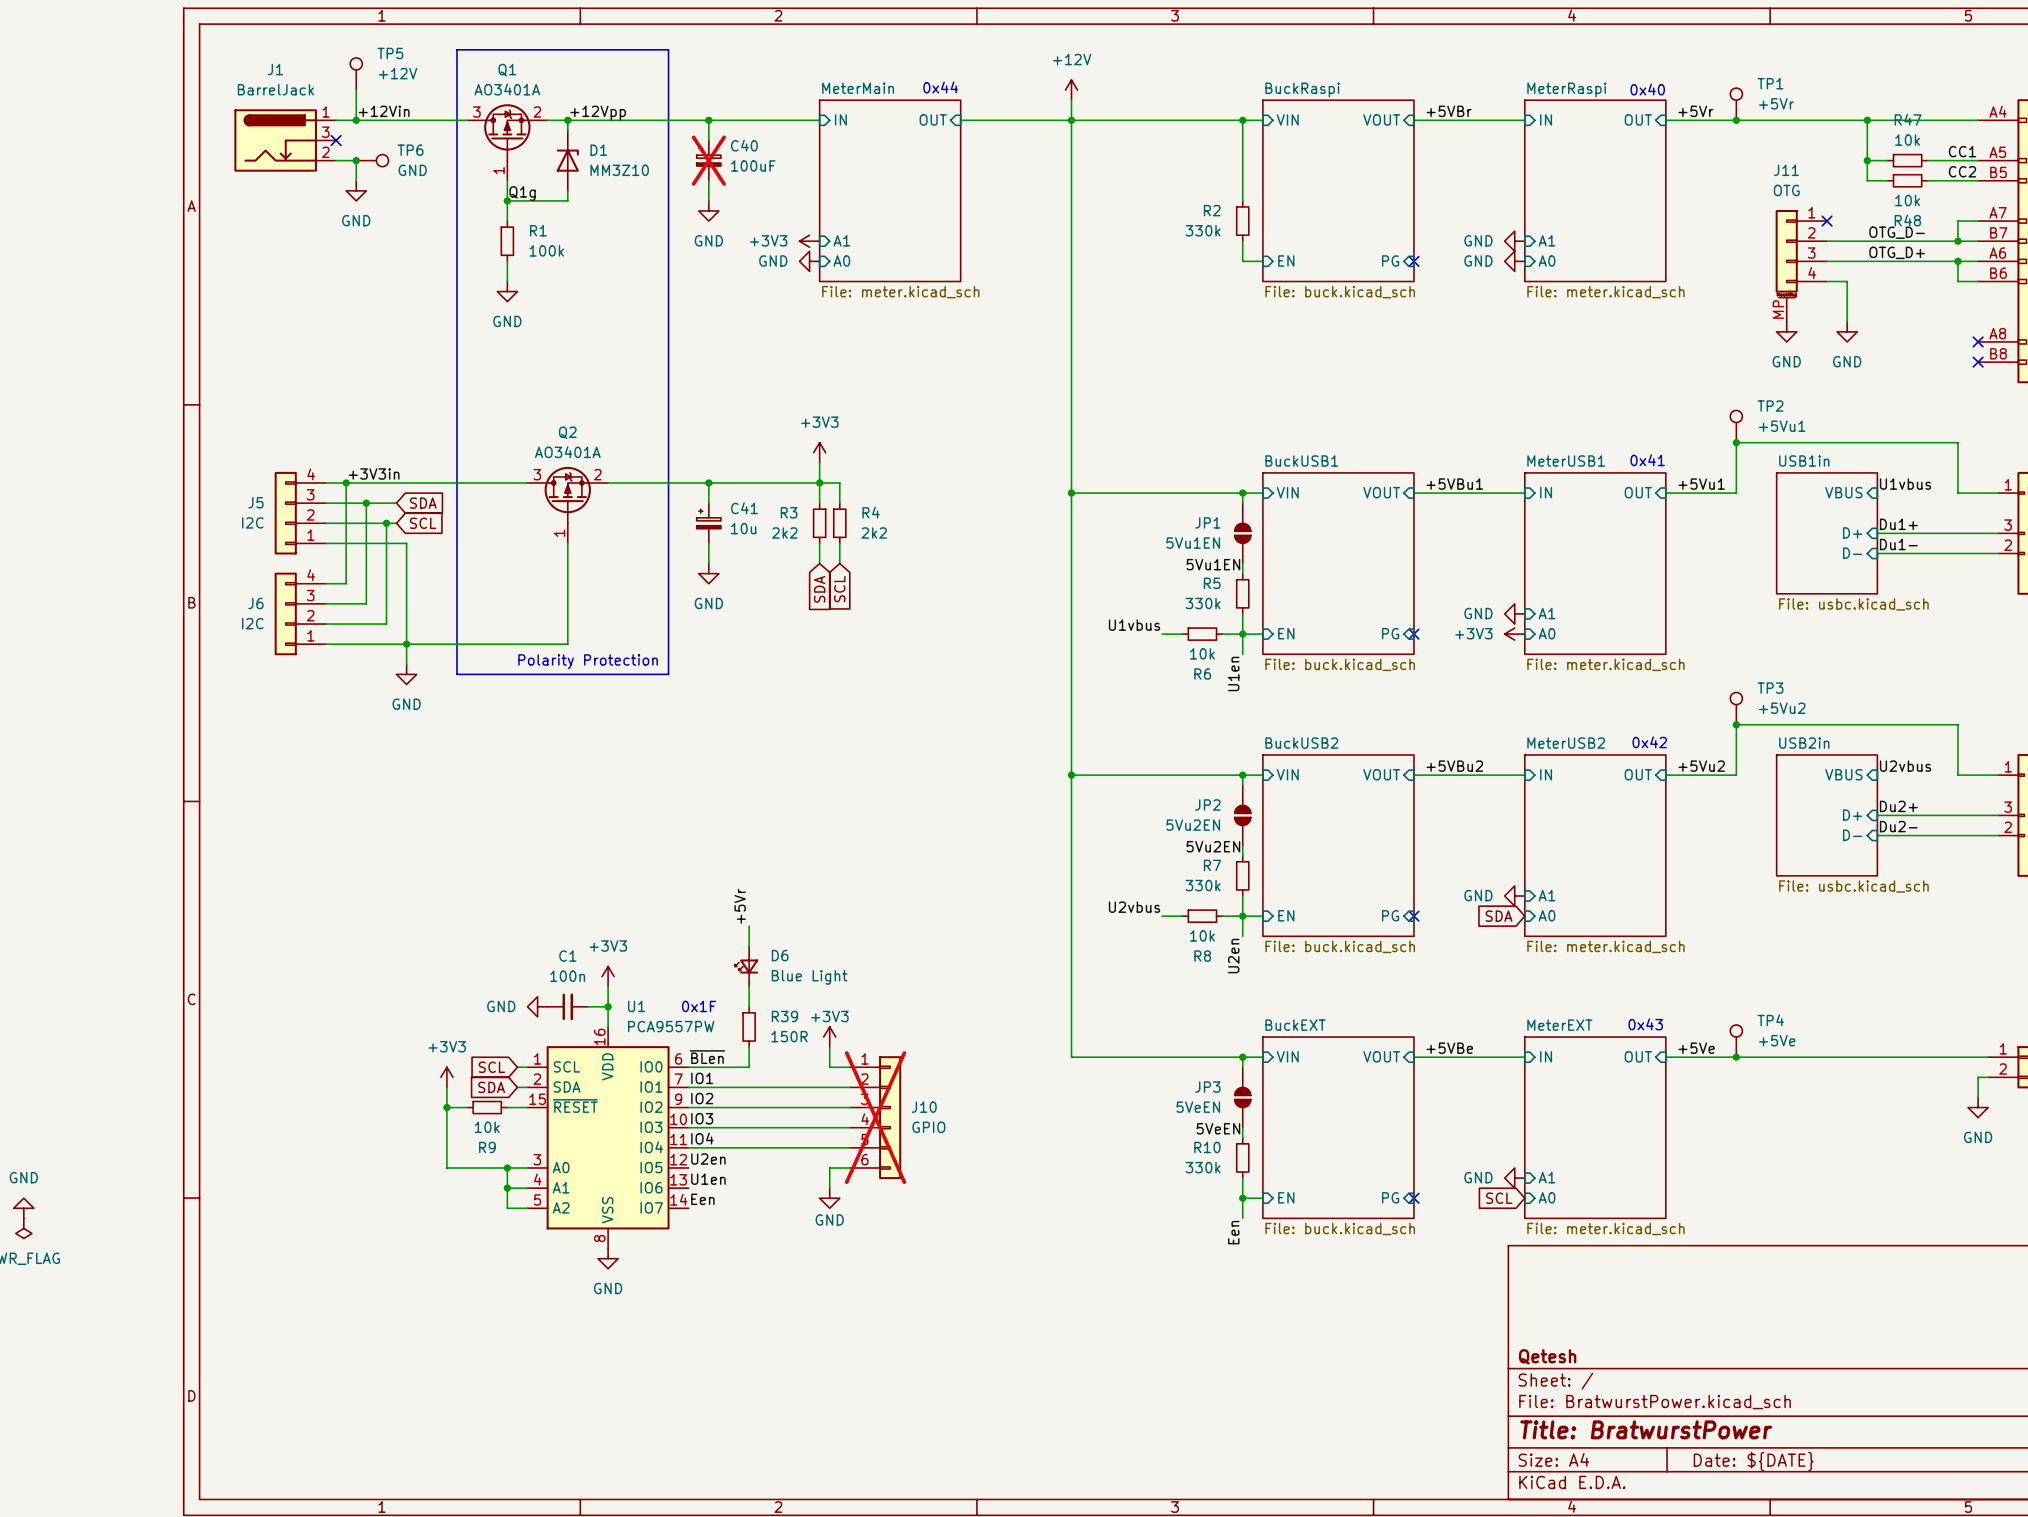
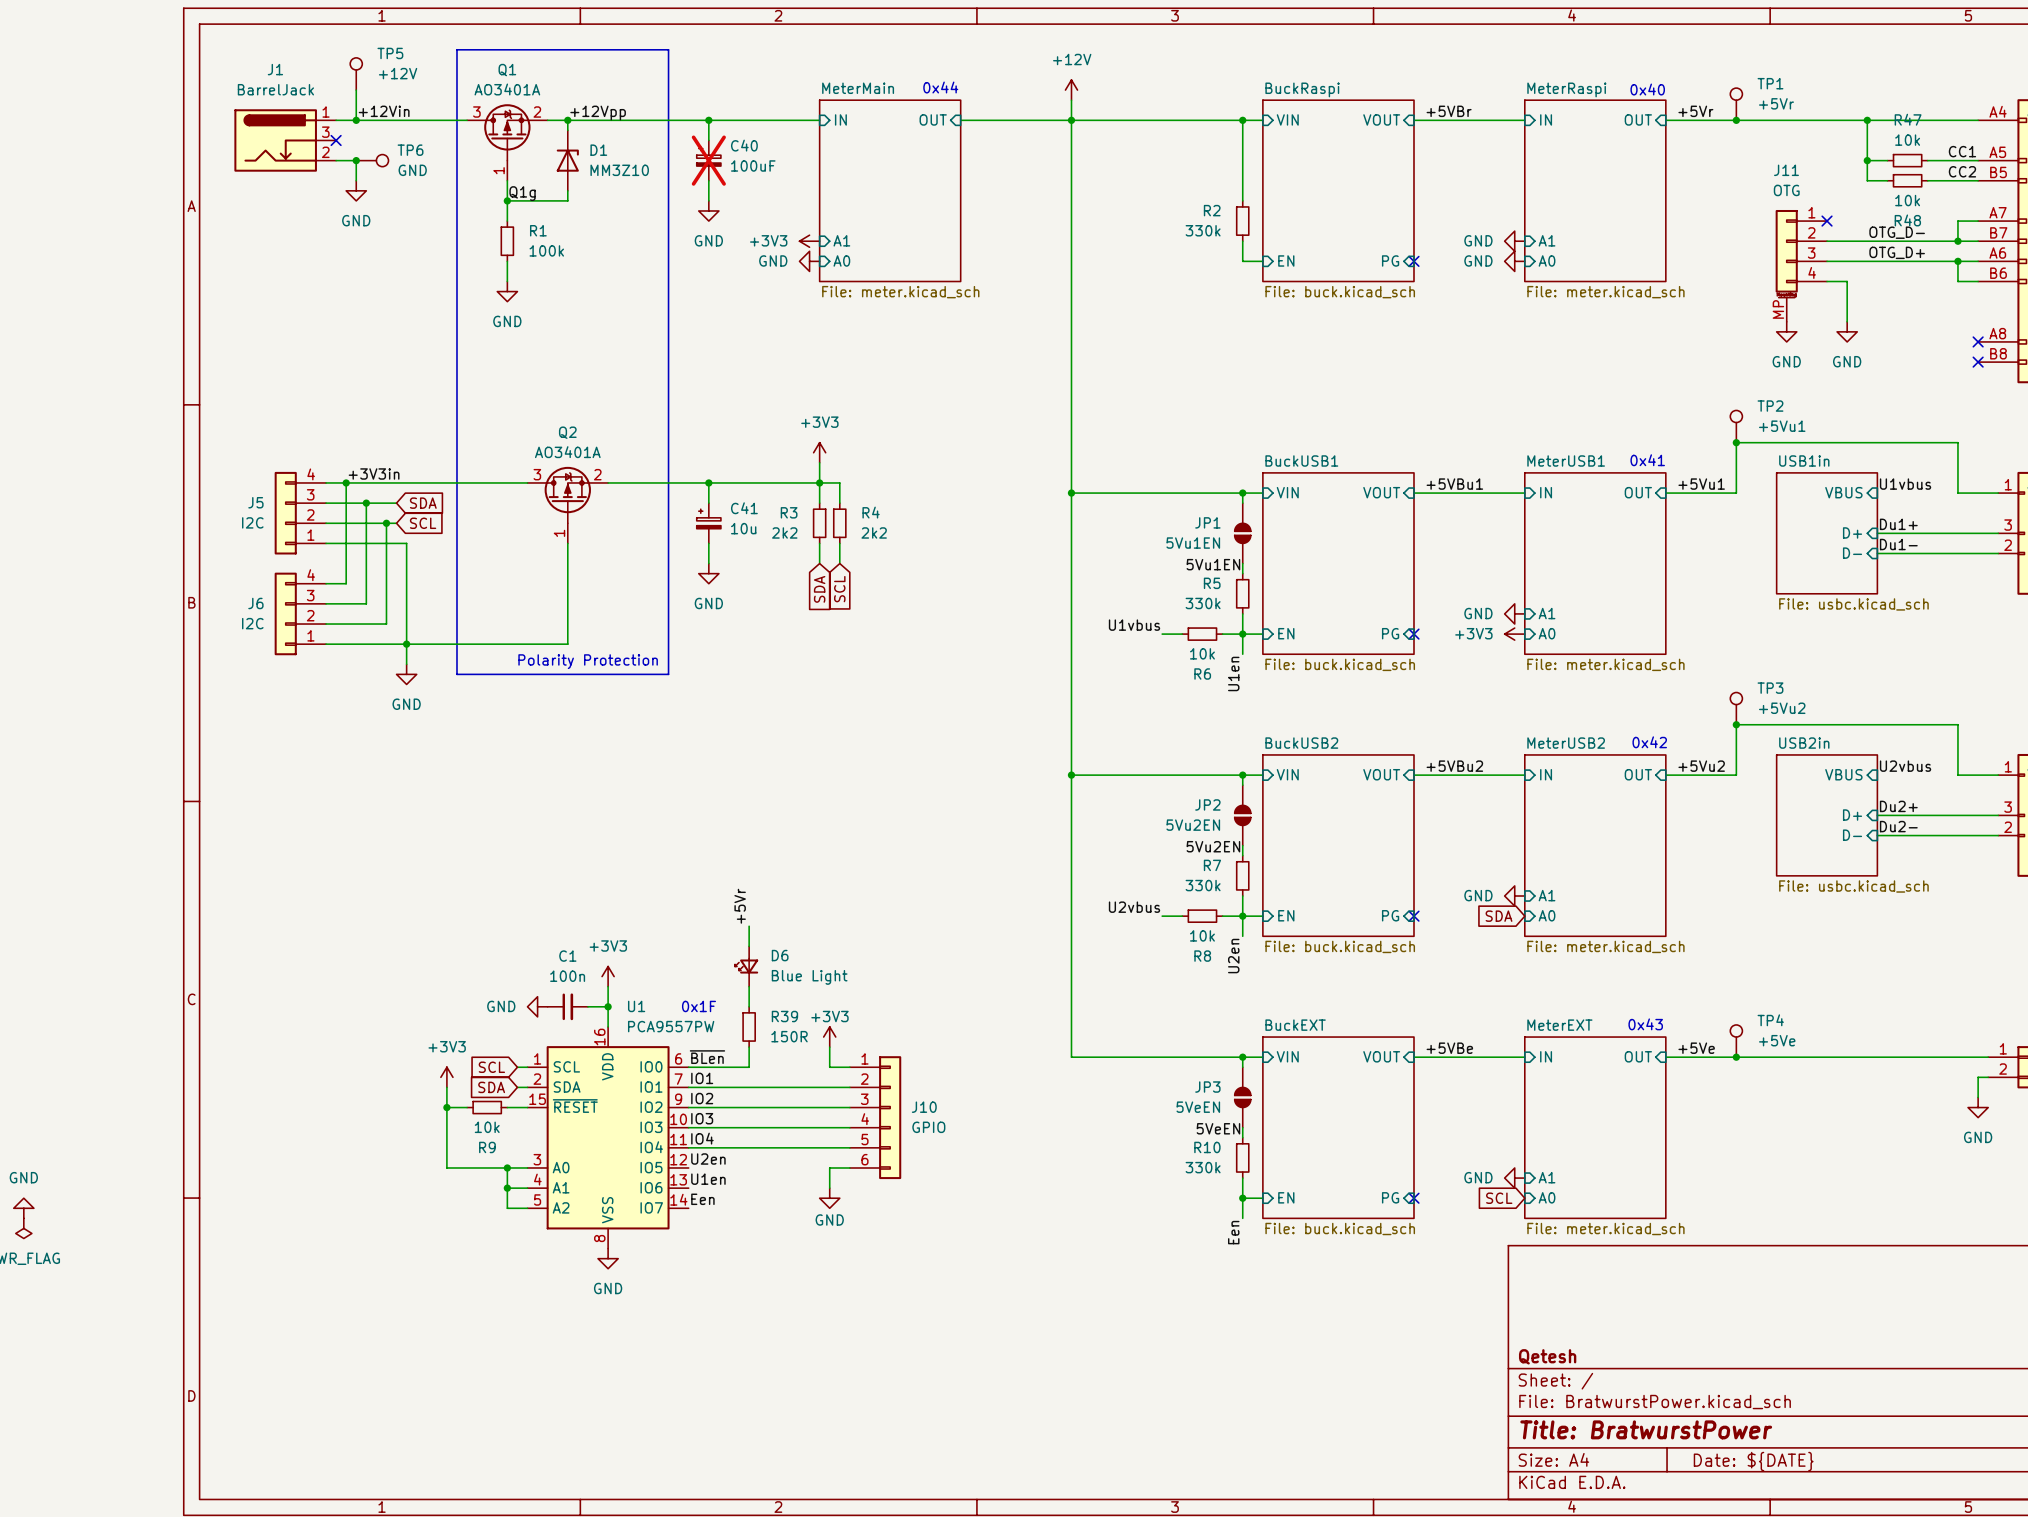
J10 do-not-place cross: (875, 1117) -> none

